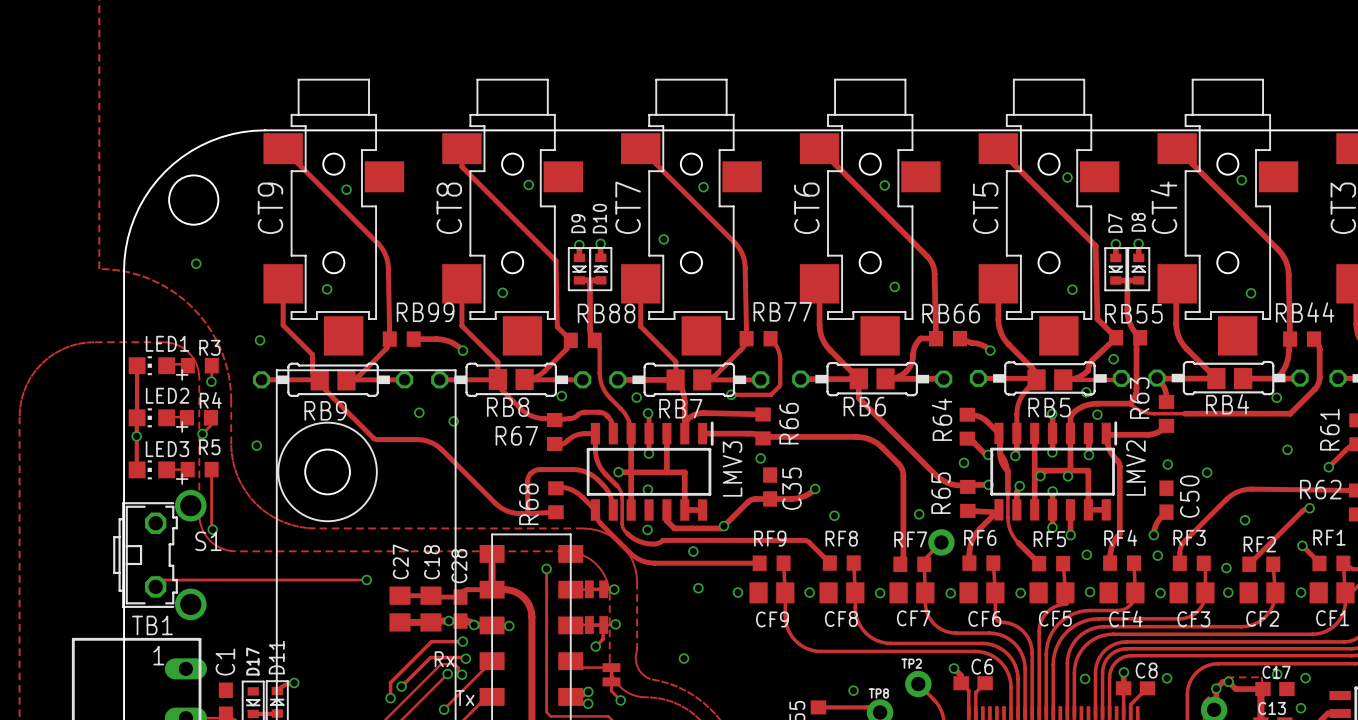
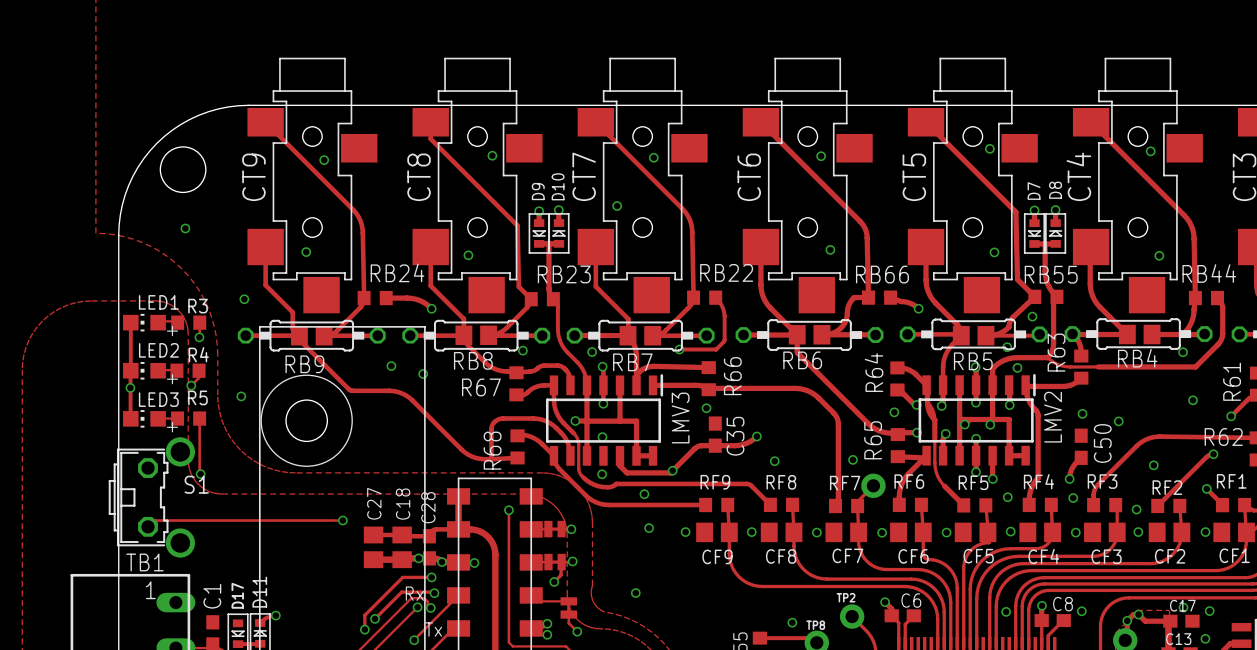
RB77 name: RB77 (782, 311) -> RB22 (726, 272)
RB99 name: RB99 (425, 312) -> RB24 (397, 272)
RB88 name: RB88 (606, 313) -> RB23 (564, 274)

